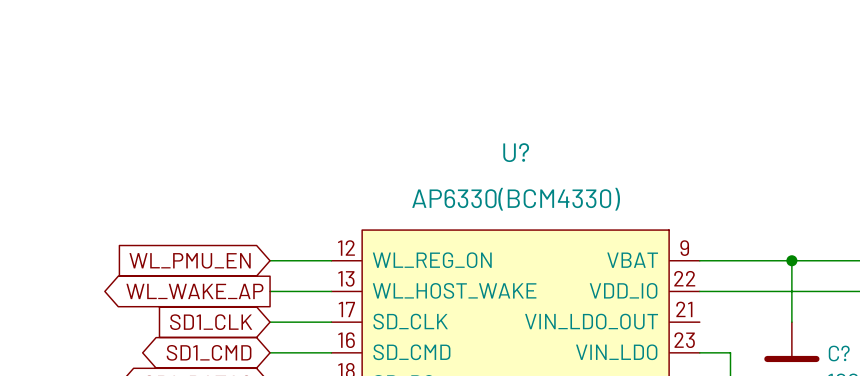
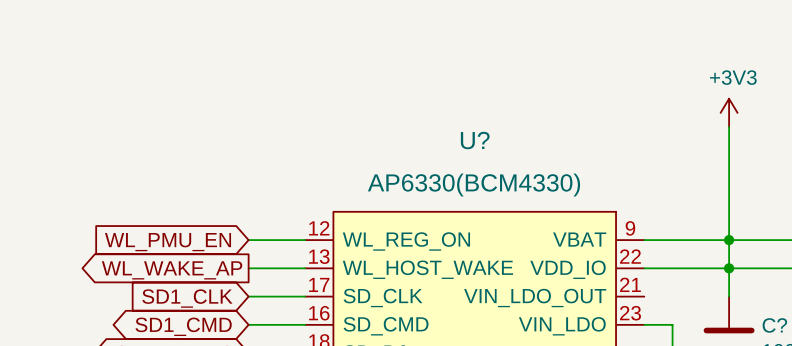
power symbol: none -> +3V3 (729, 112)
wire: none -> (729, 127) (729, 240)
junction: none -> (729, 268)

